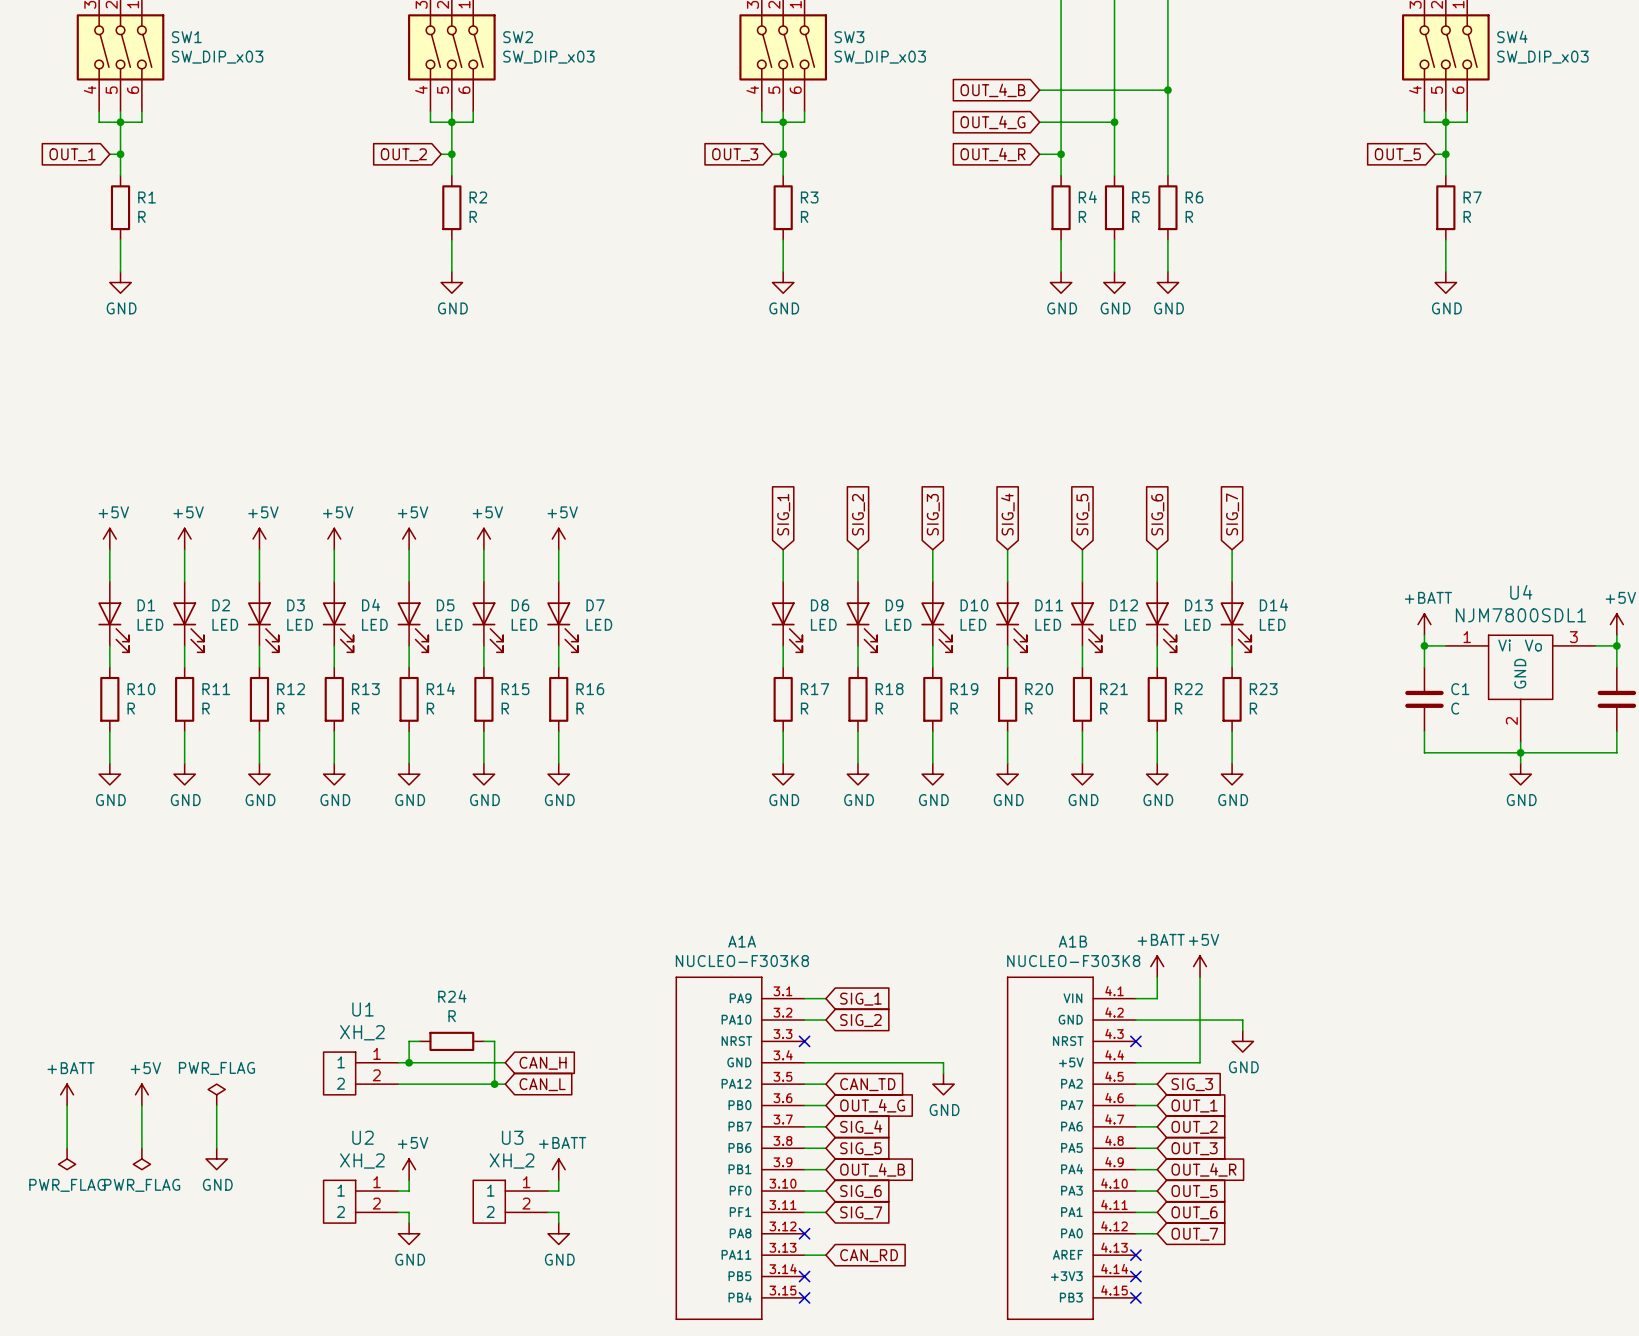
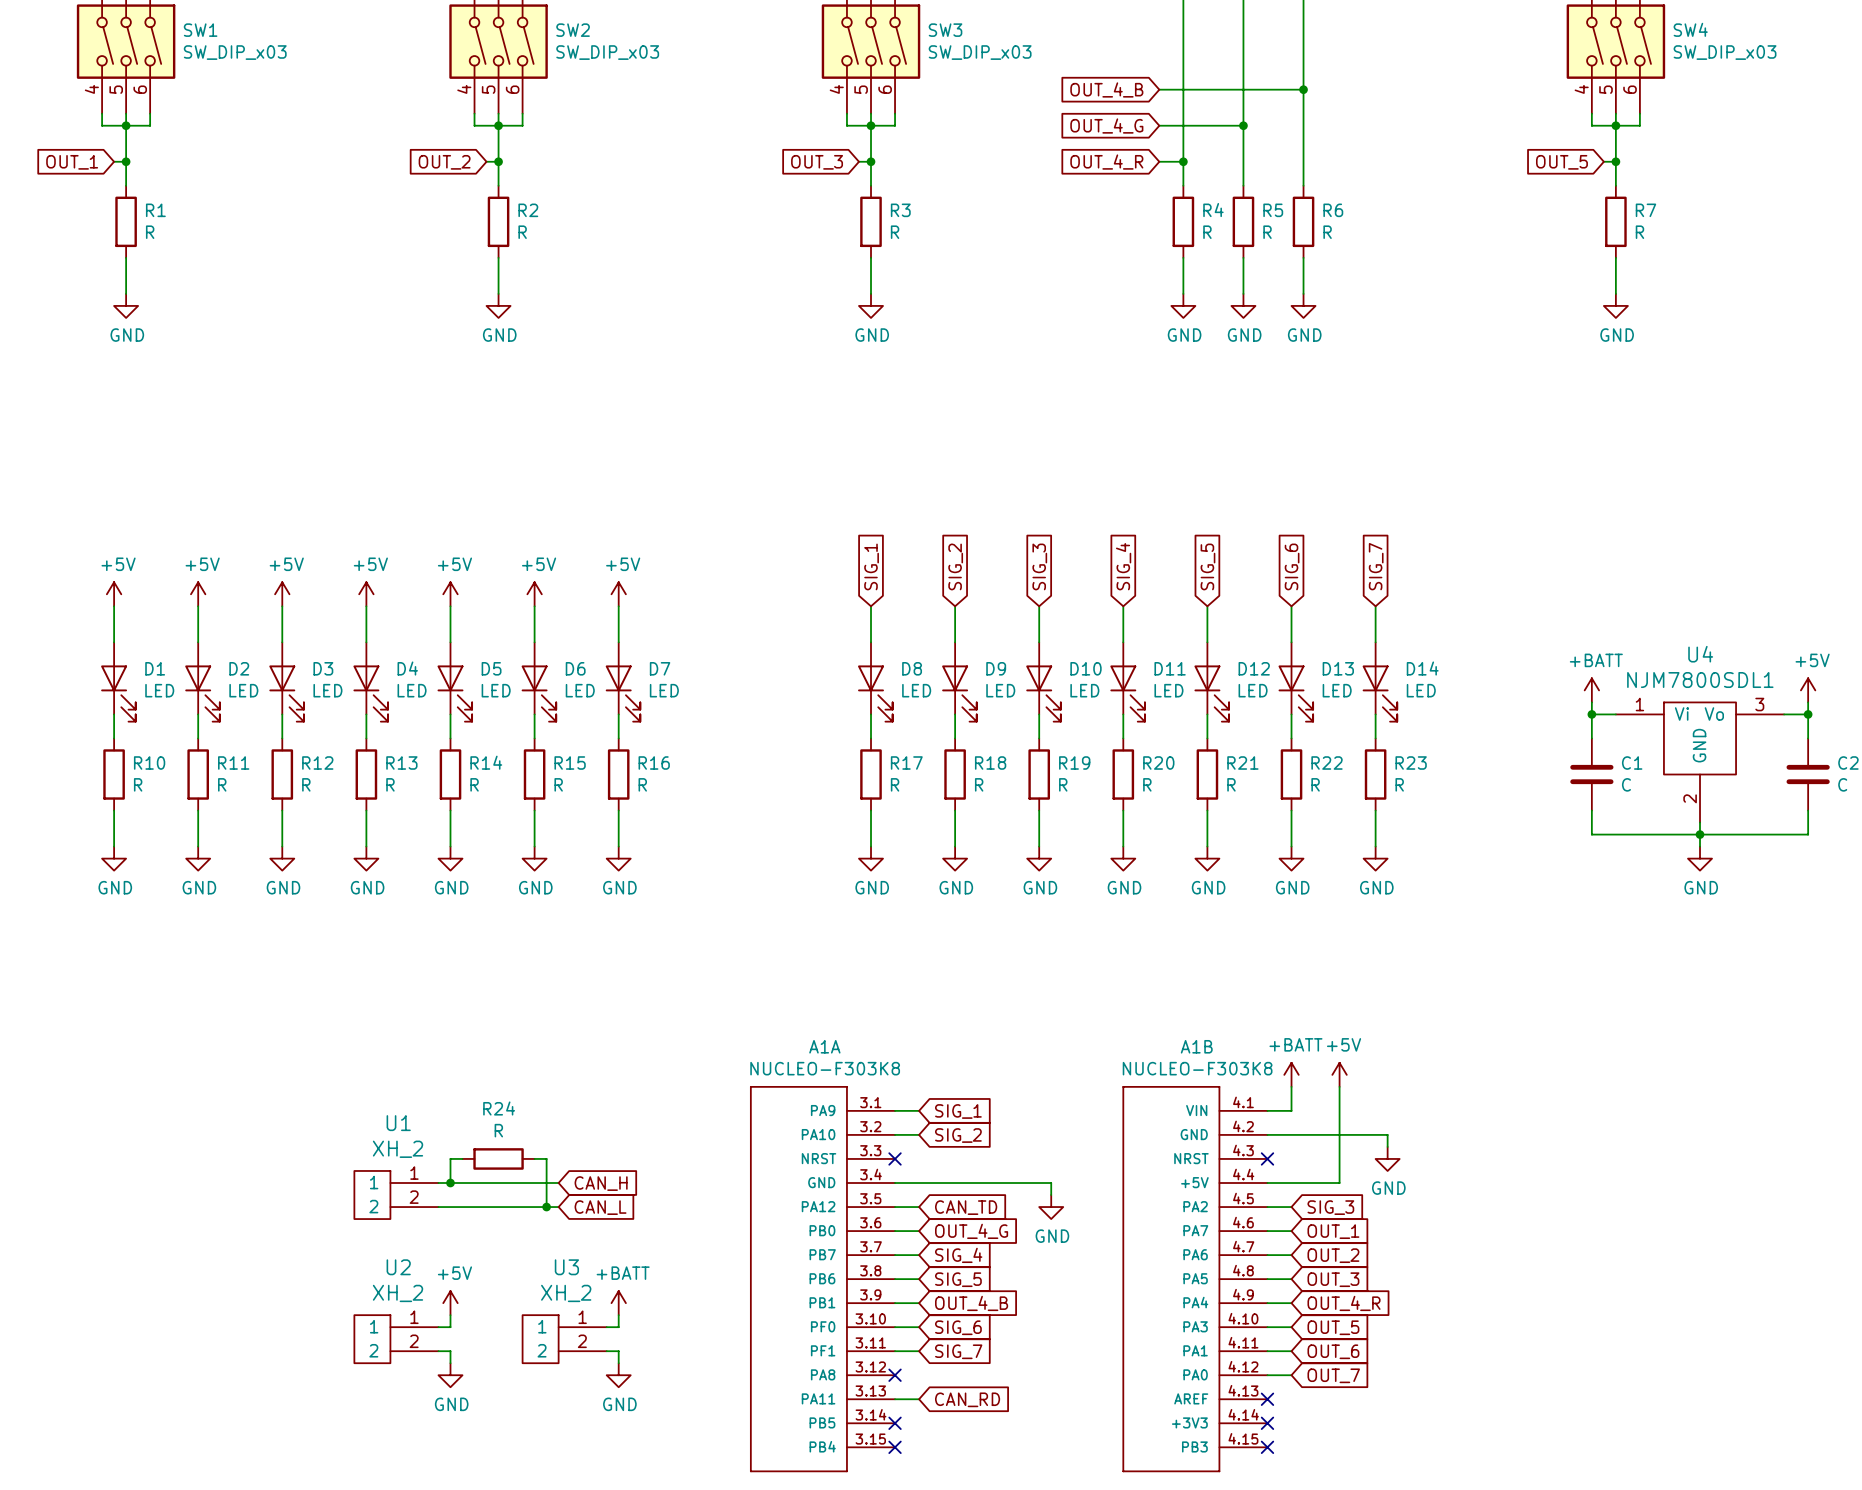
power symbol: +BATT (67, 1094) -> none
power symbol: +5V (141, 1094) -> none
power symbol: PWR_FLAG (216, 1094) -> none
wire: (67, 1105) (67, 1148) -> none
wire: (141, 1105) (141, 1148) -> none
wire: (216, 1105) (216, 1148) -> none
power symbol: PWR_FLAG (67, 1158) -> none
power symbol: PWR_FLAG (141, 1158) -> none
power symbol: GND (216, 1158) -> none

